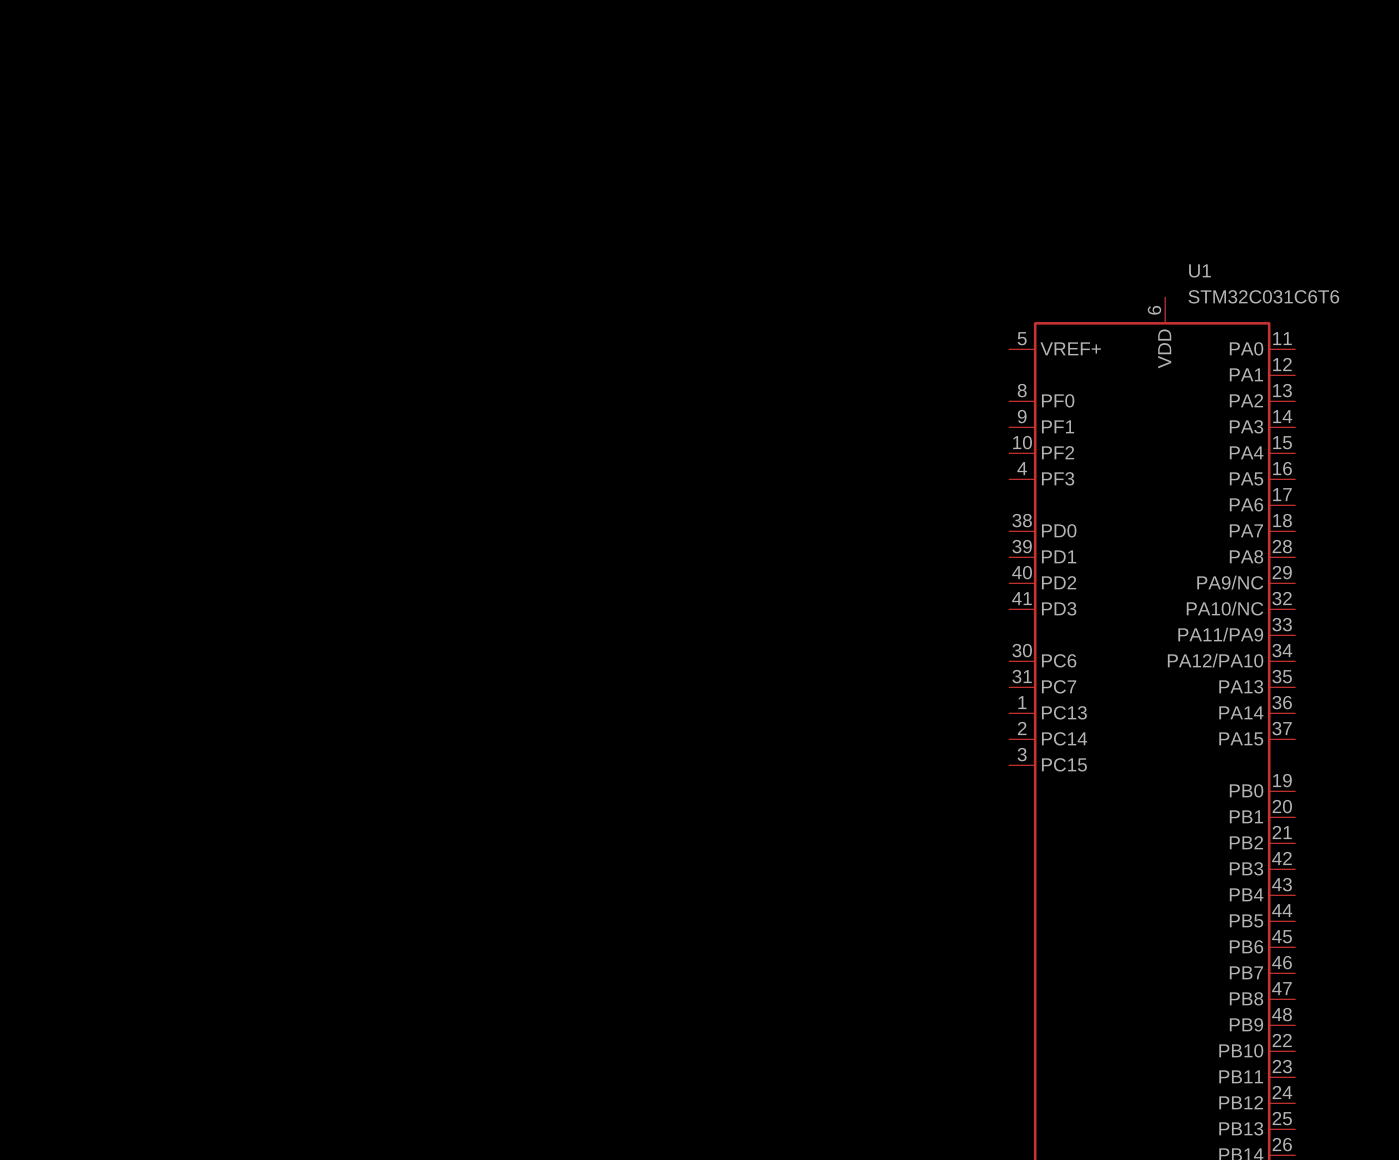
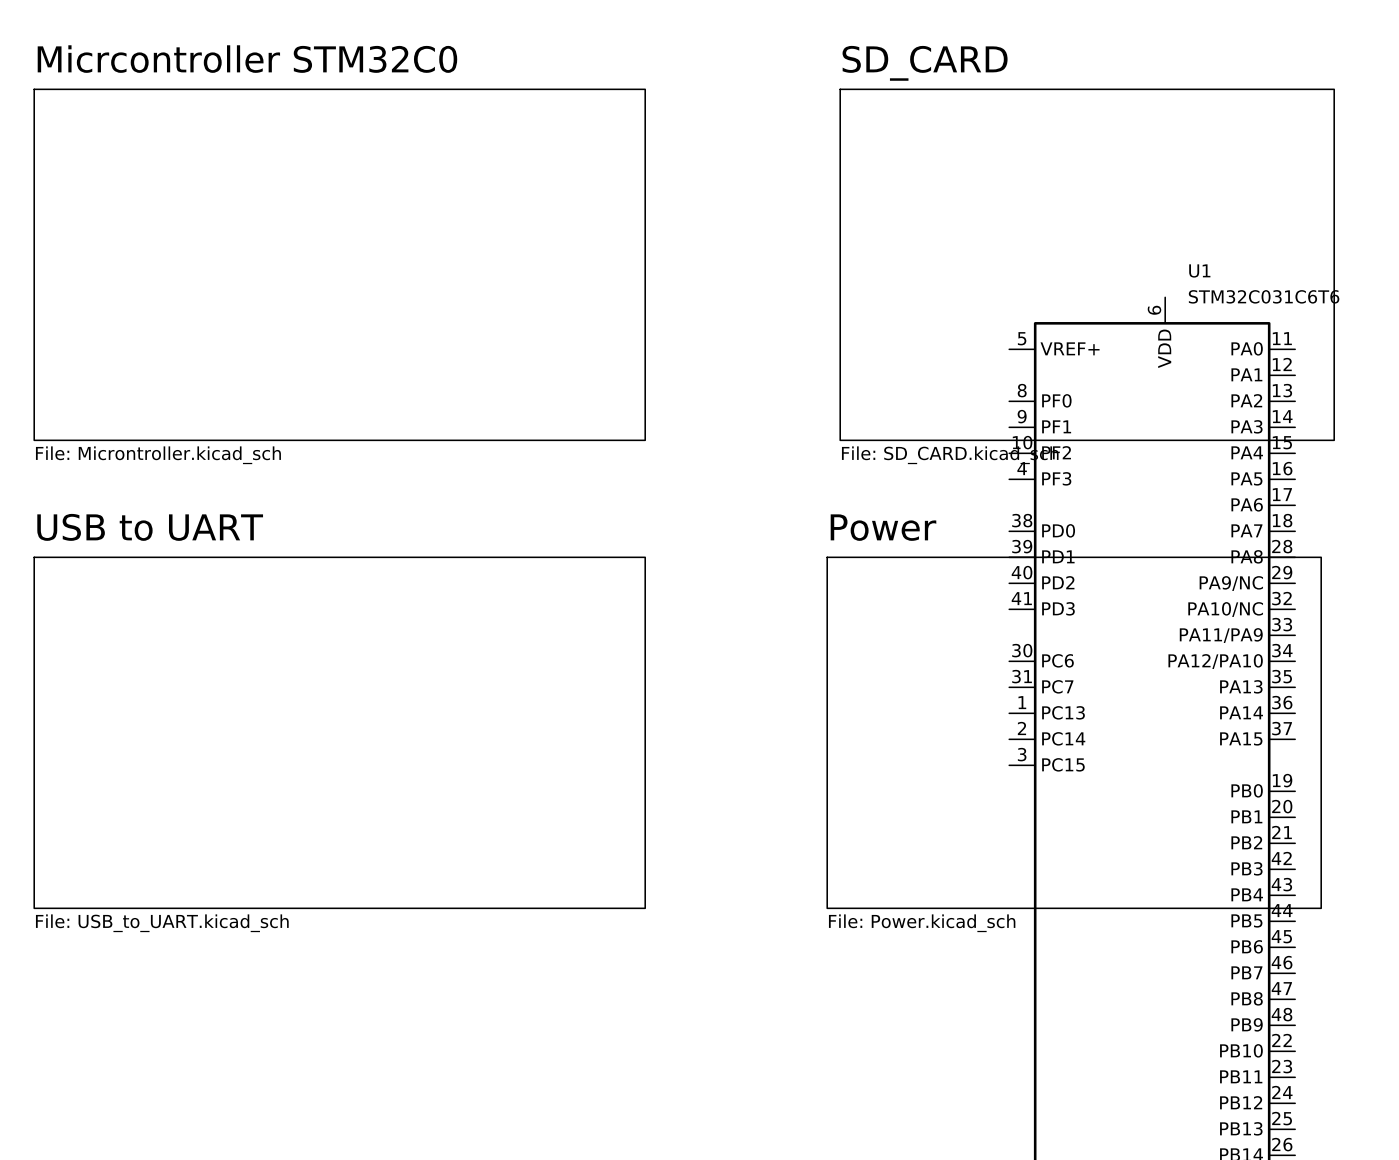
sheet Micrcontroller STM32C0: none -> File: Microntroller.kicad_sch (339, 264)
sheet SD_CARD: none -> File: SD_CARD.kicad_sch (1087, 264)
sheet USB to UART: none -> File: USB_to_UART.kicad_sch (339, 732)
sheet Power: none -> File: Power.kicad_sch (1074, 732)

